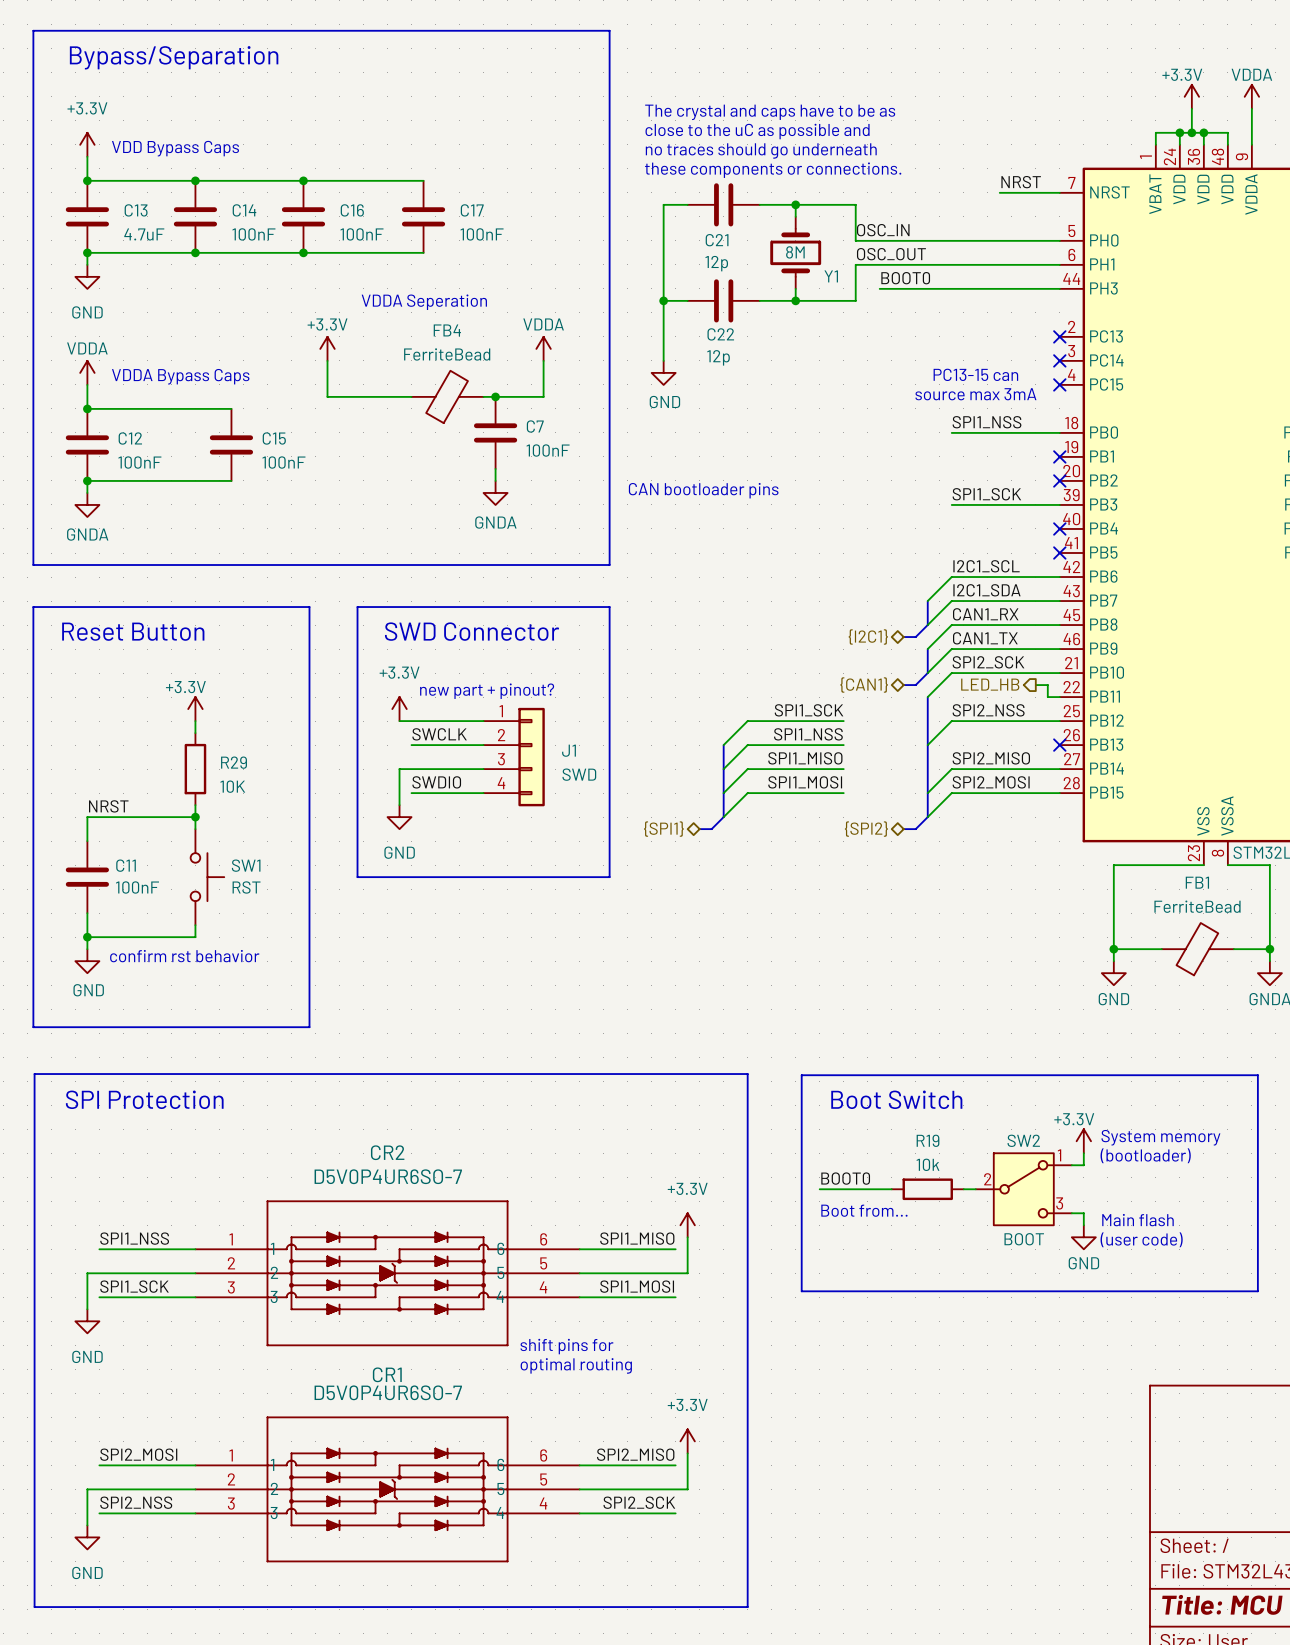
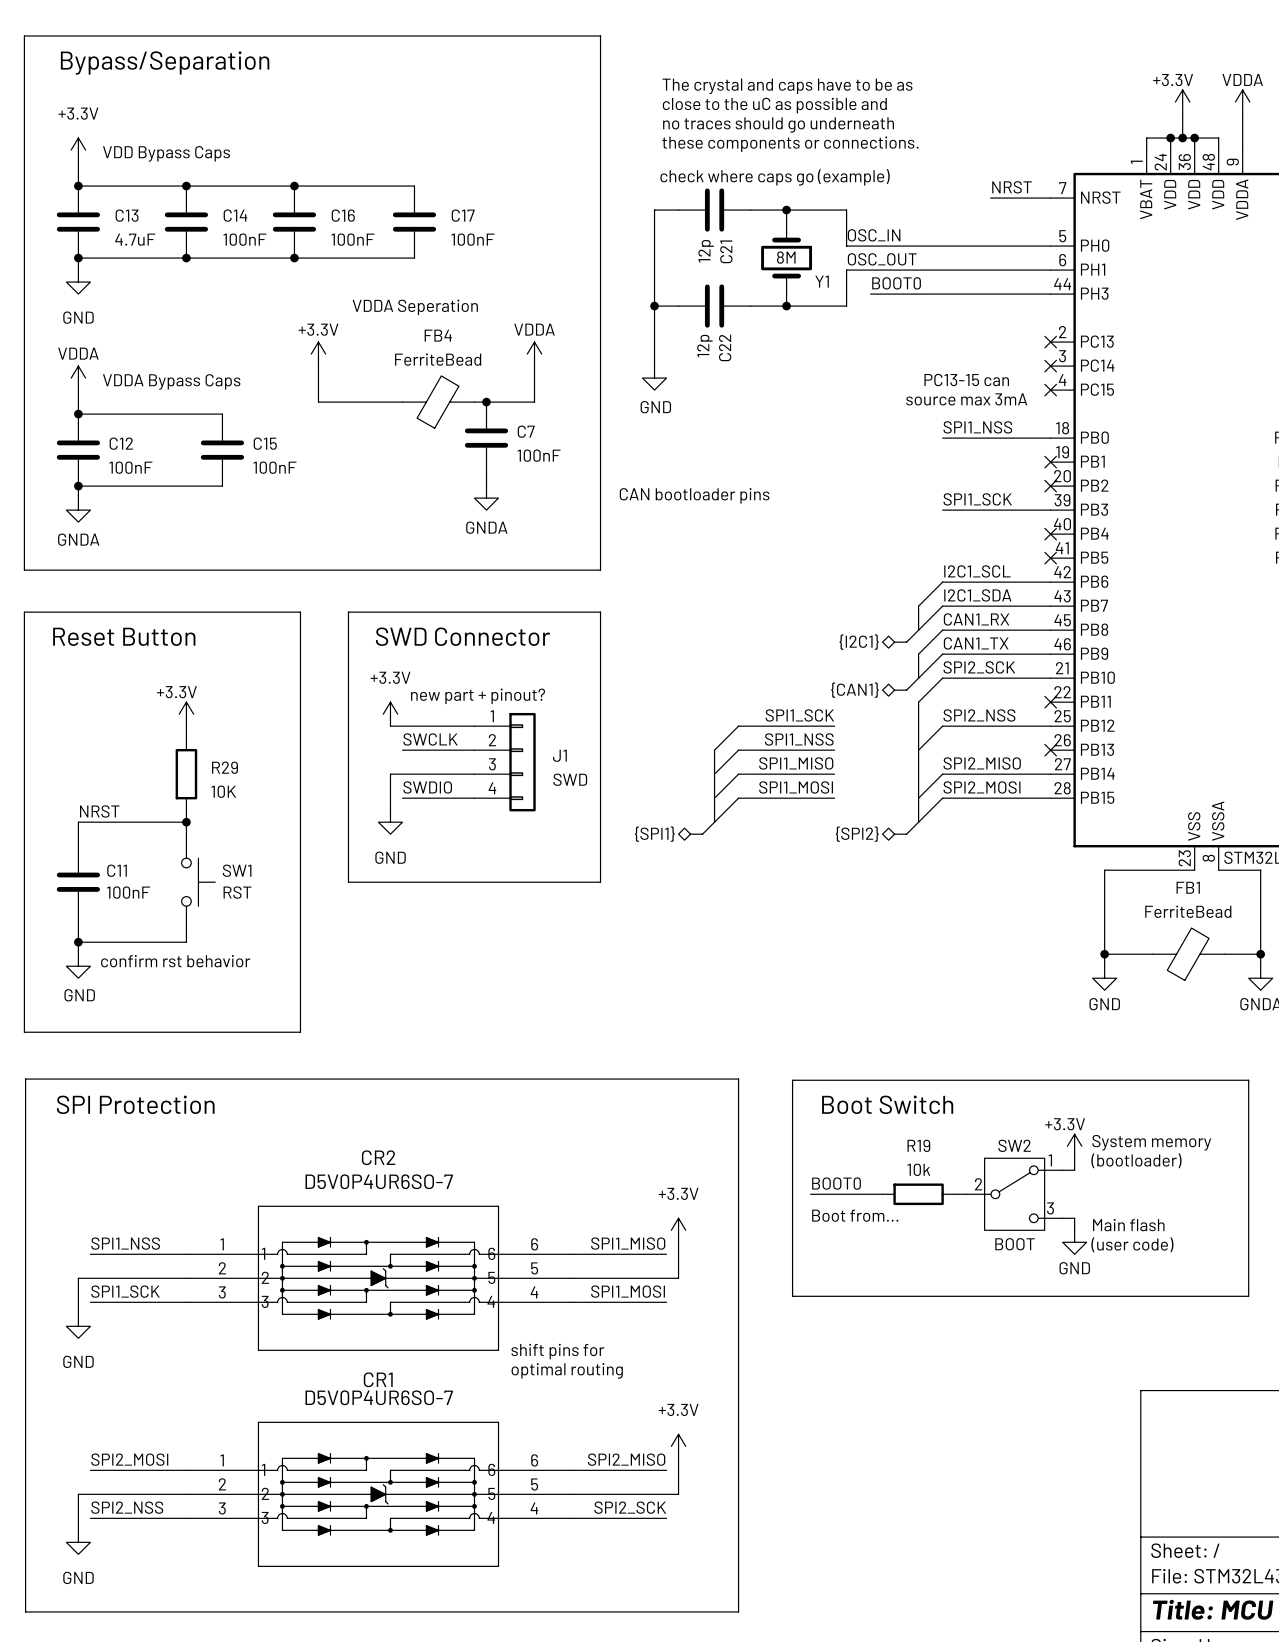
text position: The crystal and caps have to be as (770, 112) -> The crystal and caps have to be as (787, 86)
text position: close to the uC as possible and (757, 131) -> close to the uC as possible and (774, 105)
text position: no traces should go underneath (761, 150) -> no traces should go underneath (778, 124)
text position: these components or connections. (773, 170) -> these components or connections. (790, 144)
text: none -> check where caps go (example) (775, 177)
C21 name rotation: 0° (717, 240) -> 90° counterclockwise (726, 251)
C21 value rotation: 0° (716, 263) -> 90° counterclockwise (706, 251)
C22 name rotation: 0° (720, 334) -> 90° counterclockwise (725, 347)
C22 value rotation: 0° (718, 357) -> 90° counterclockwise (704, 346)
hierarchical label: LED_HB (990, 684) -> none
wire: (1035, 685) (1047, 685) (1047, 697) (1059, 697) -> none
no-connect mark: none -> (1050, 702)

